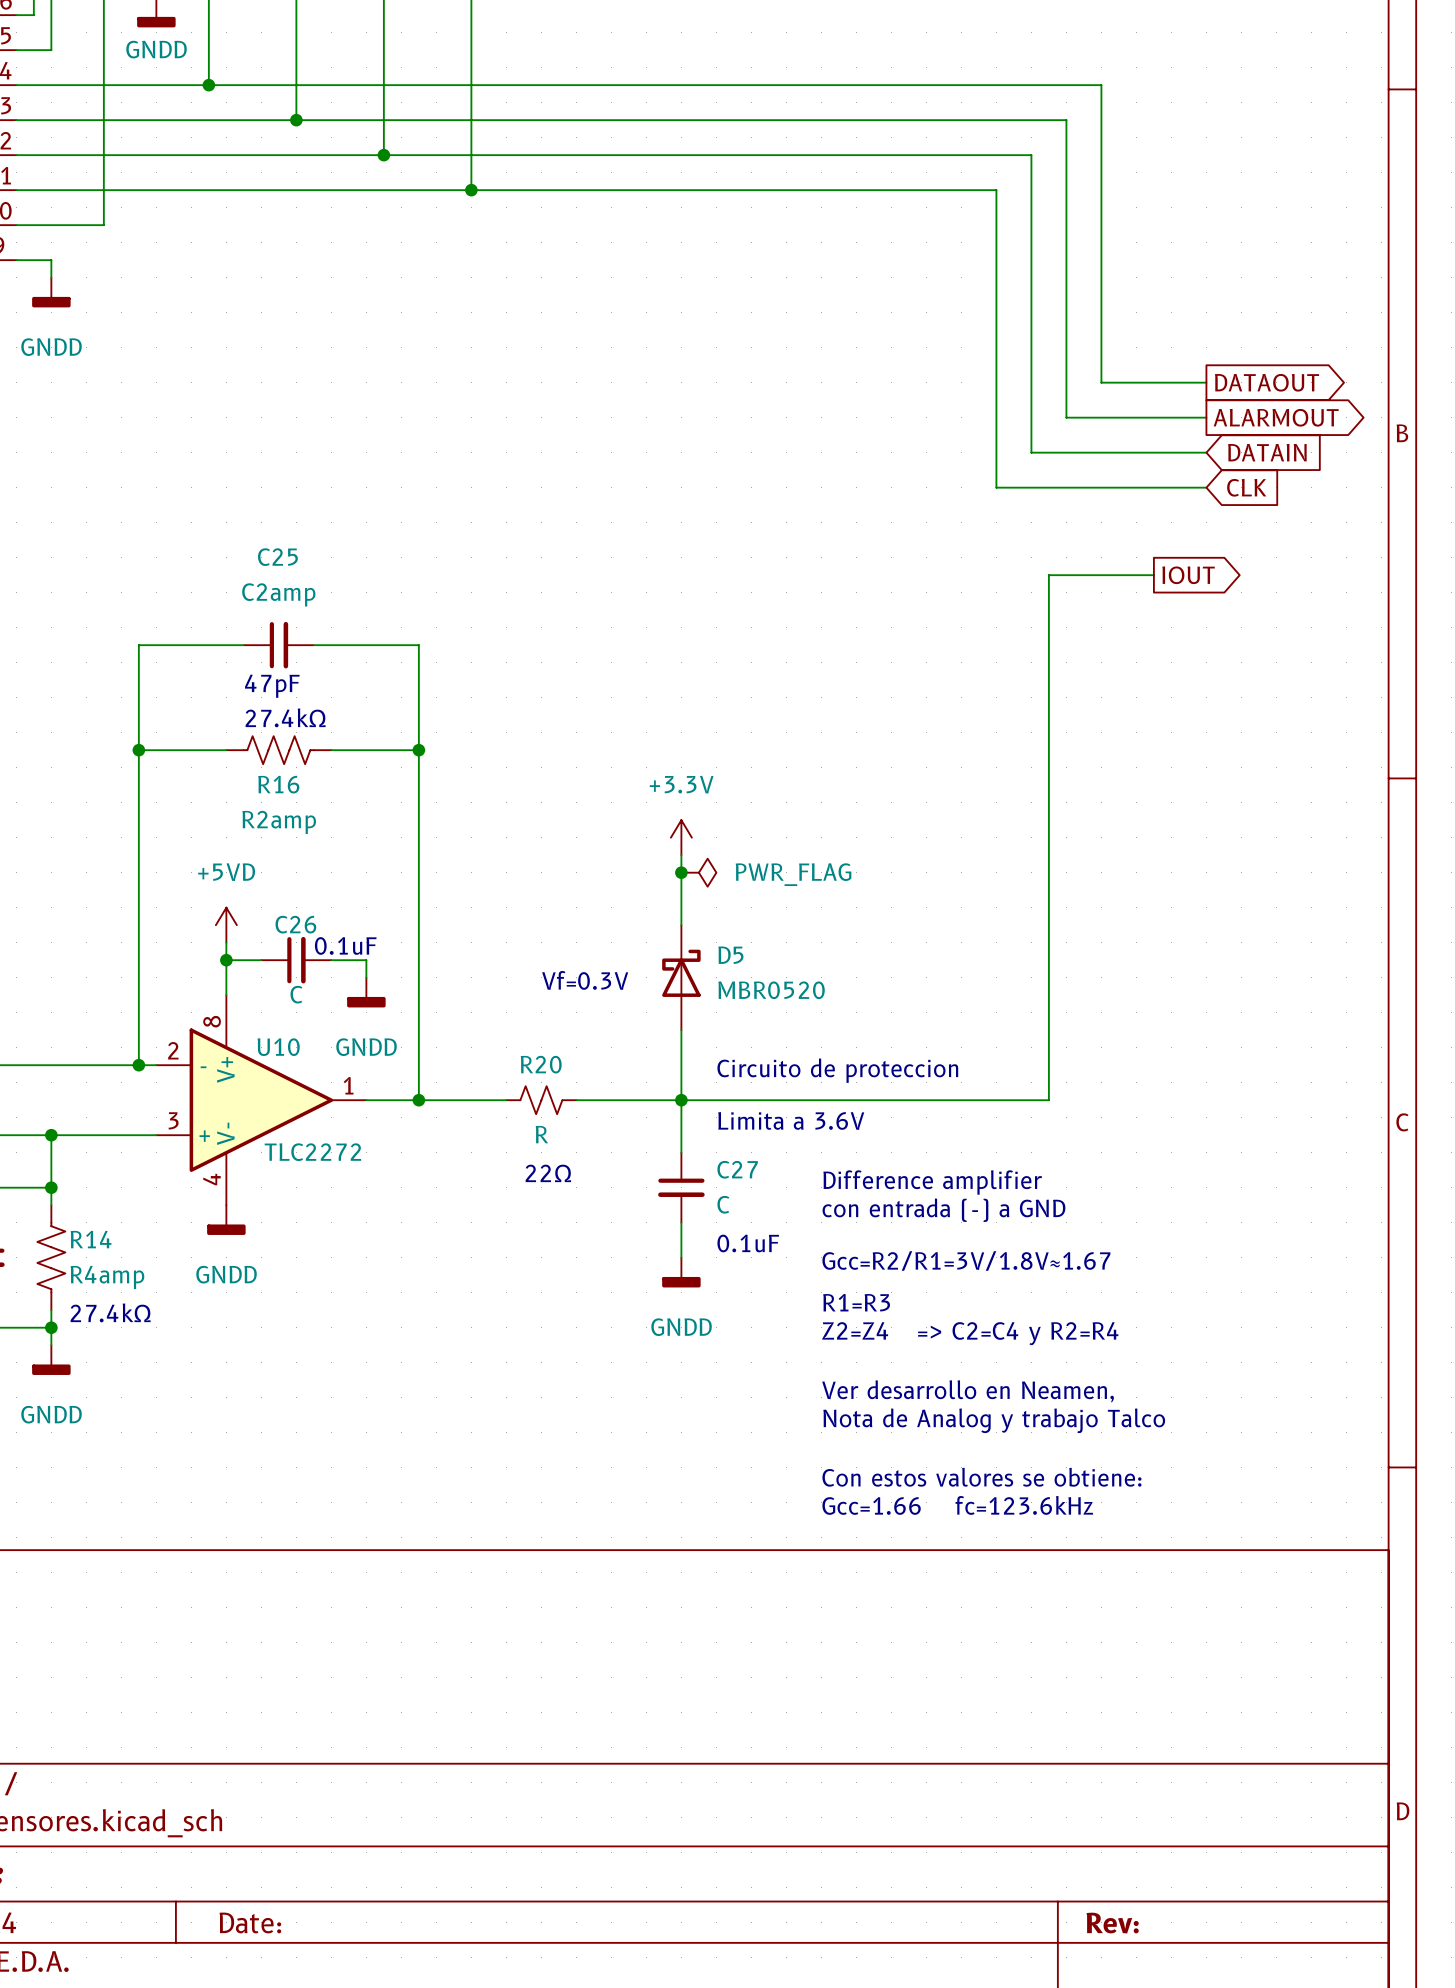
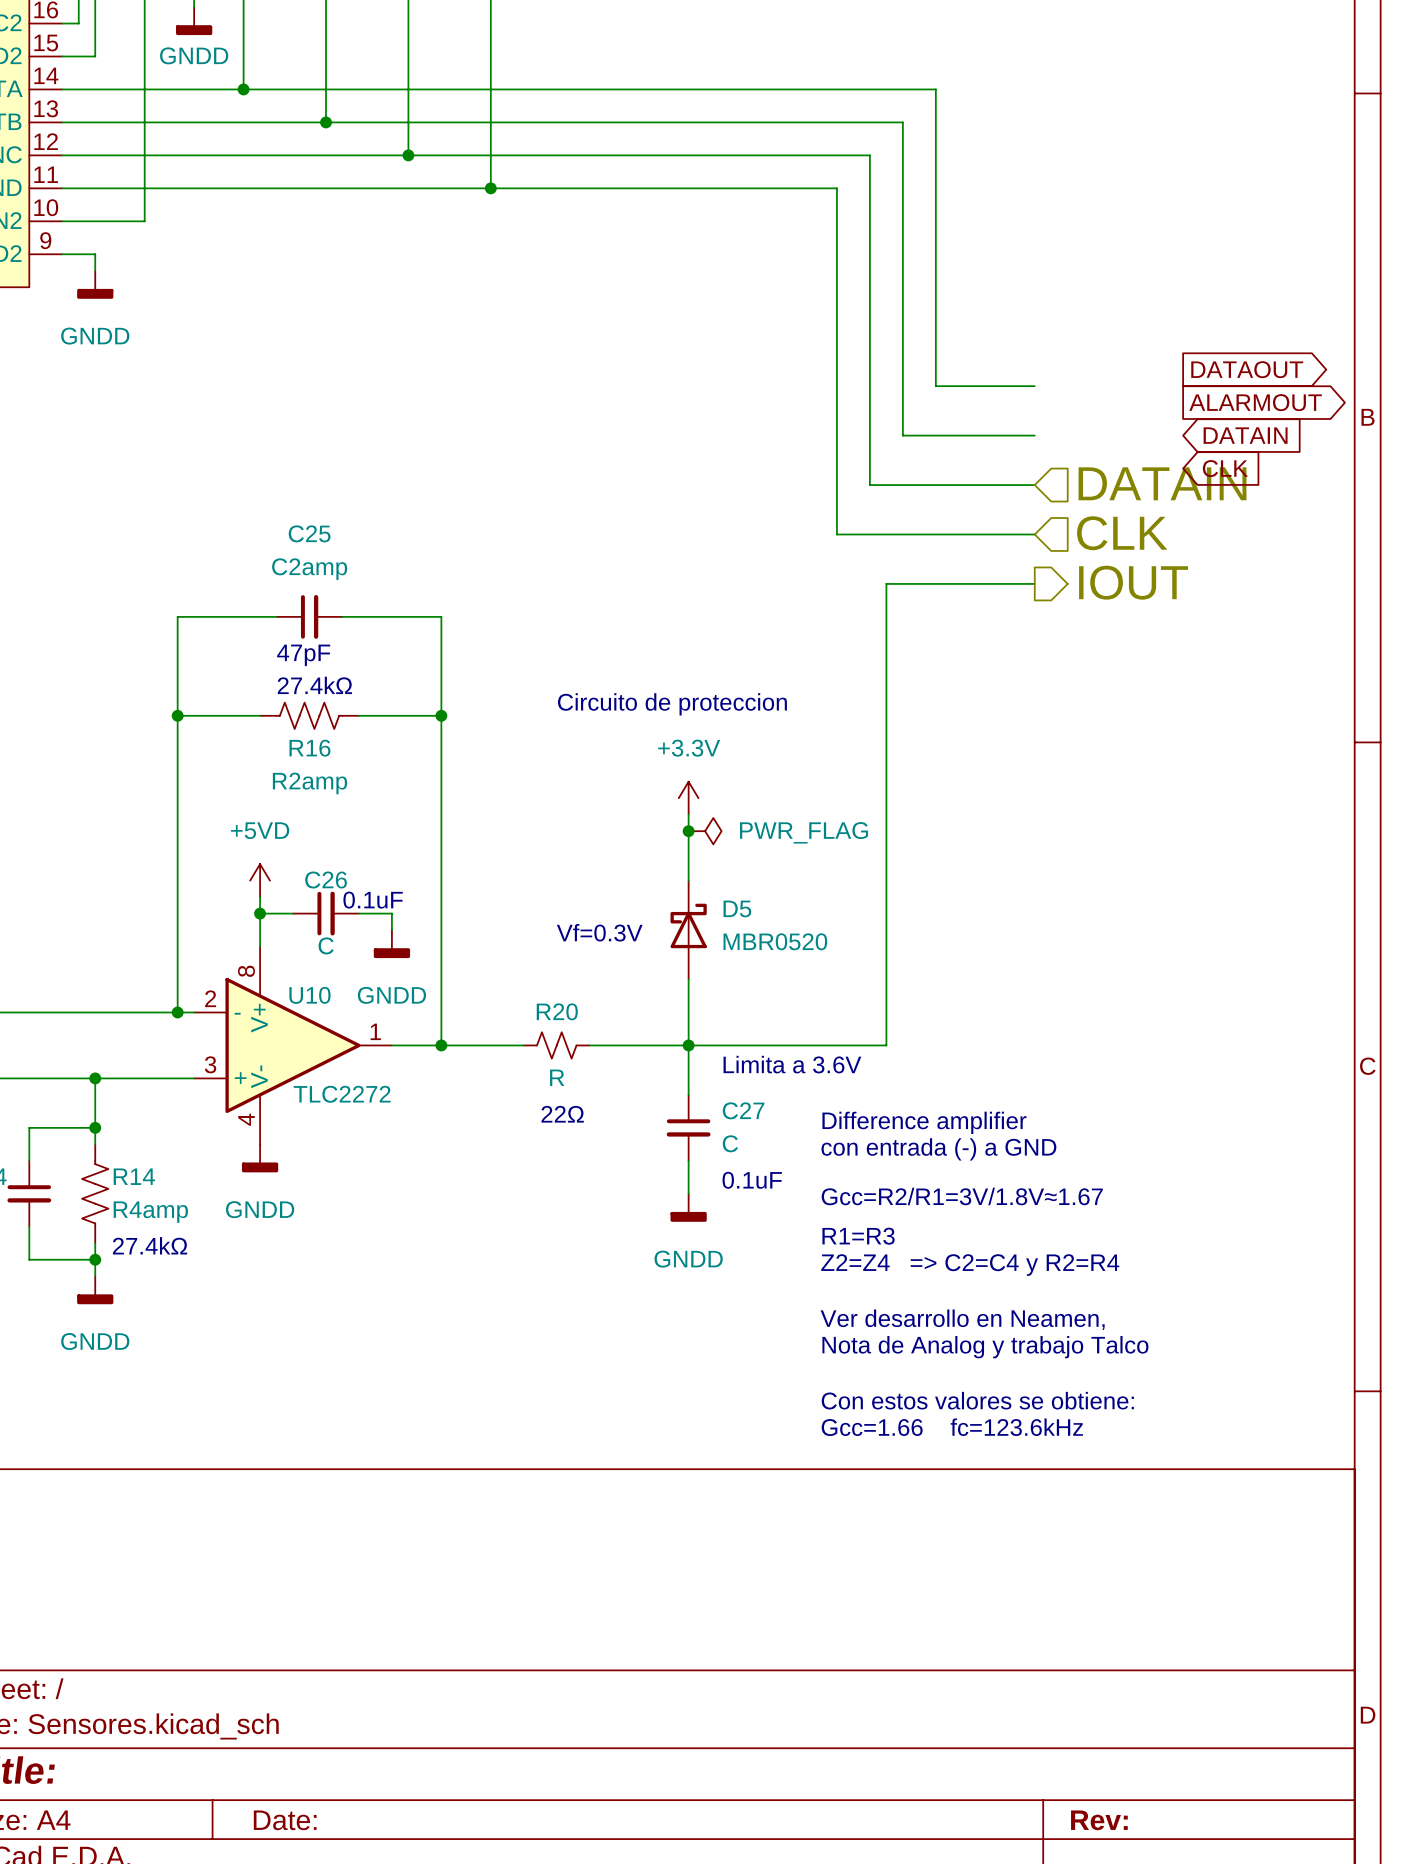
wire: (943, 85) (1101, 85) (1101, 382) (1206, 382) -> (935, 89) (935, 386) (1034, 386)
wire: (908, 120) (1066, 120) (1066, 417) (1206, 417) -> none
wire: (873, 155) (1031, 155) (1031, 452) -> (902, 122) (902, 435) (1018, 435)
wire: none -> (869, 155) (869, 485) (1034, 485)
wire: (838, 190) (996, 190) (996, 487) (1206, 487) -> (836, 188) (836, 534) (1034, 534)
wire: (1048, 452) (1206, 452) -> none
hierarchical label: none -> DATAIN (1162, 483)
hierarchical label: none -> CLK (1122, 533)
wire: (1153, 575) (1048, 575) (1048, 1100) (891, 1100) -> (1034, 583) (886, 583) (886, 1045)
global label: IOUT (1188, 575) -> none
hierarchical label: none -> IOUT (1133, 582)
text: none -> Circuito de proteccion (672, 704)
text: Circuito de proteccion (837, 1070) -> none

